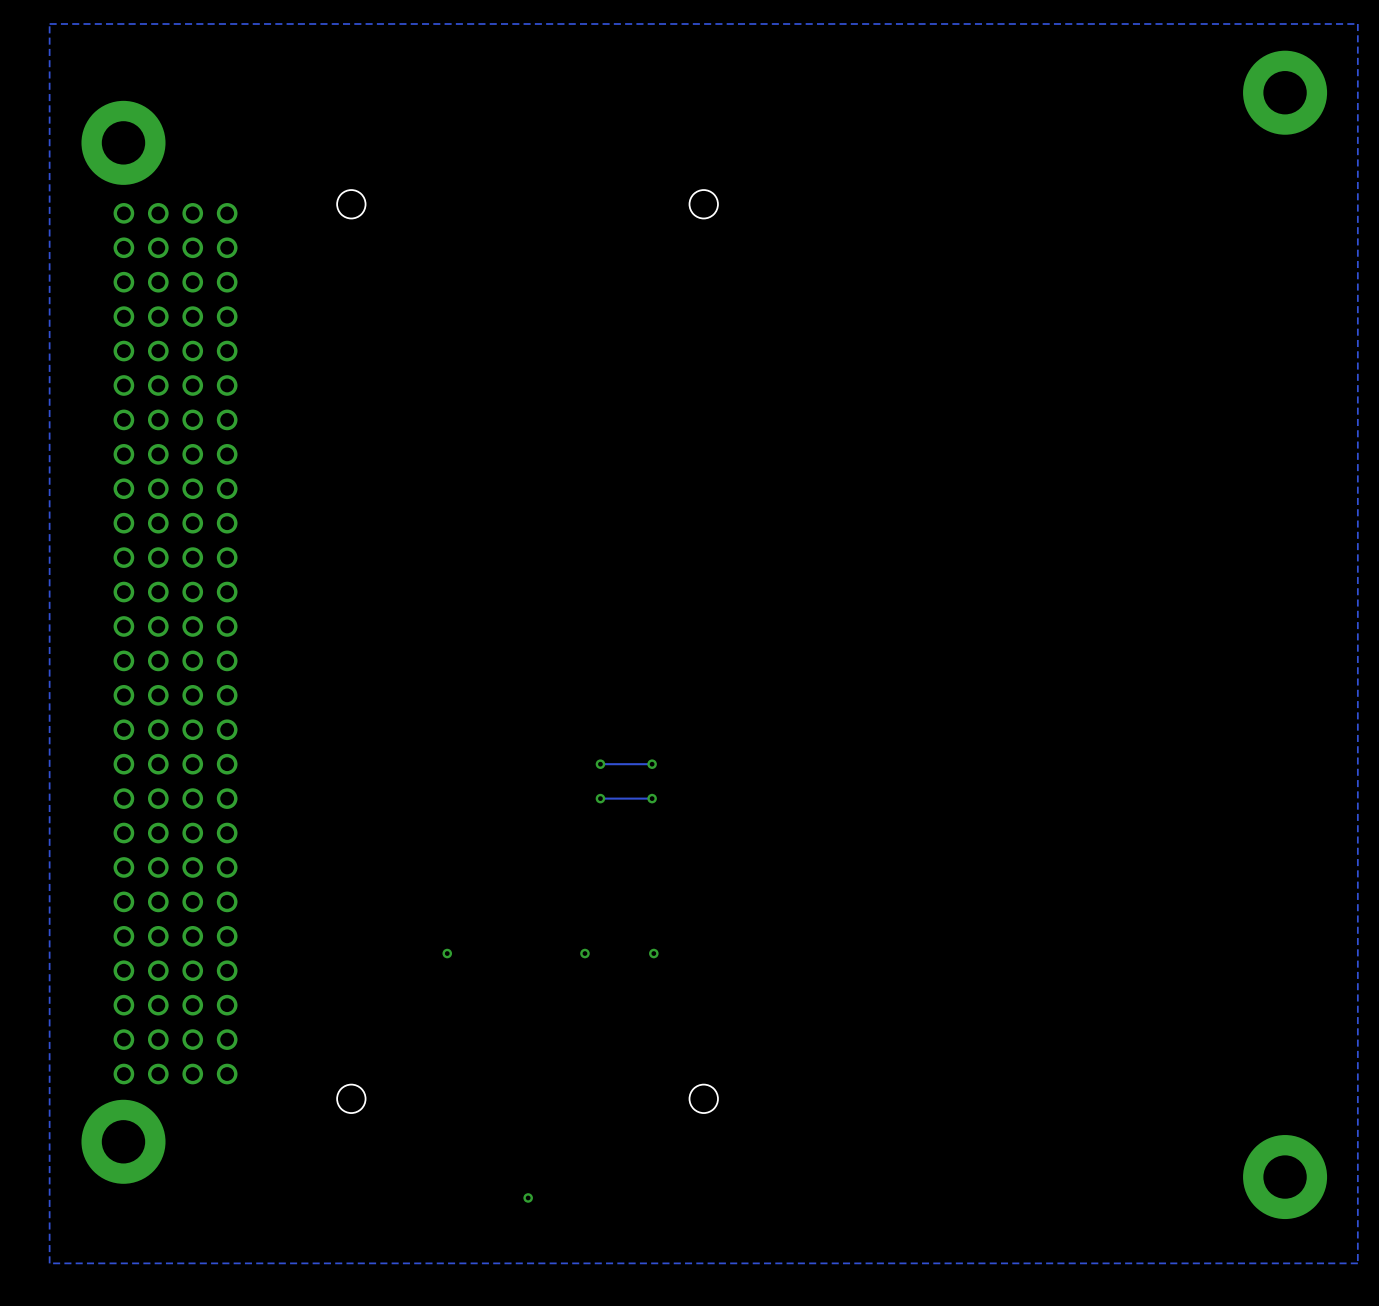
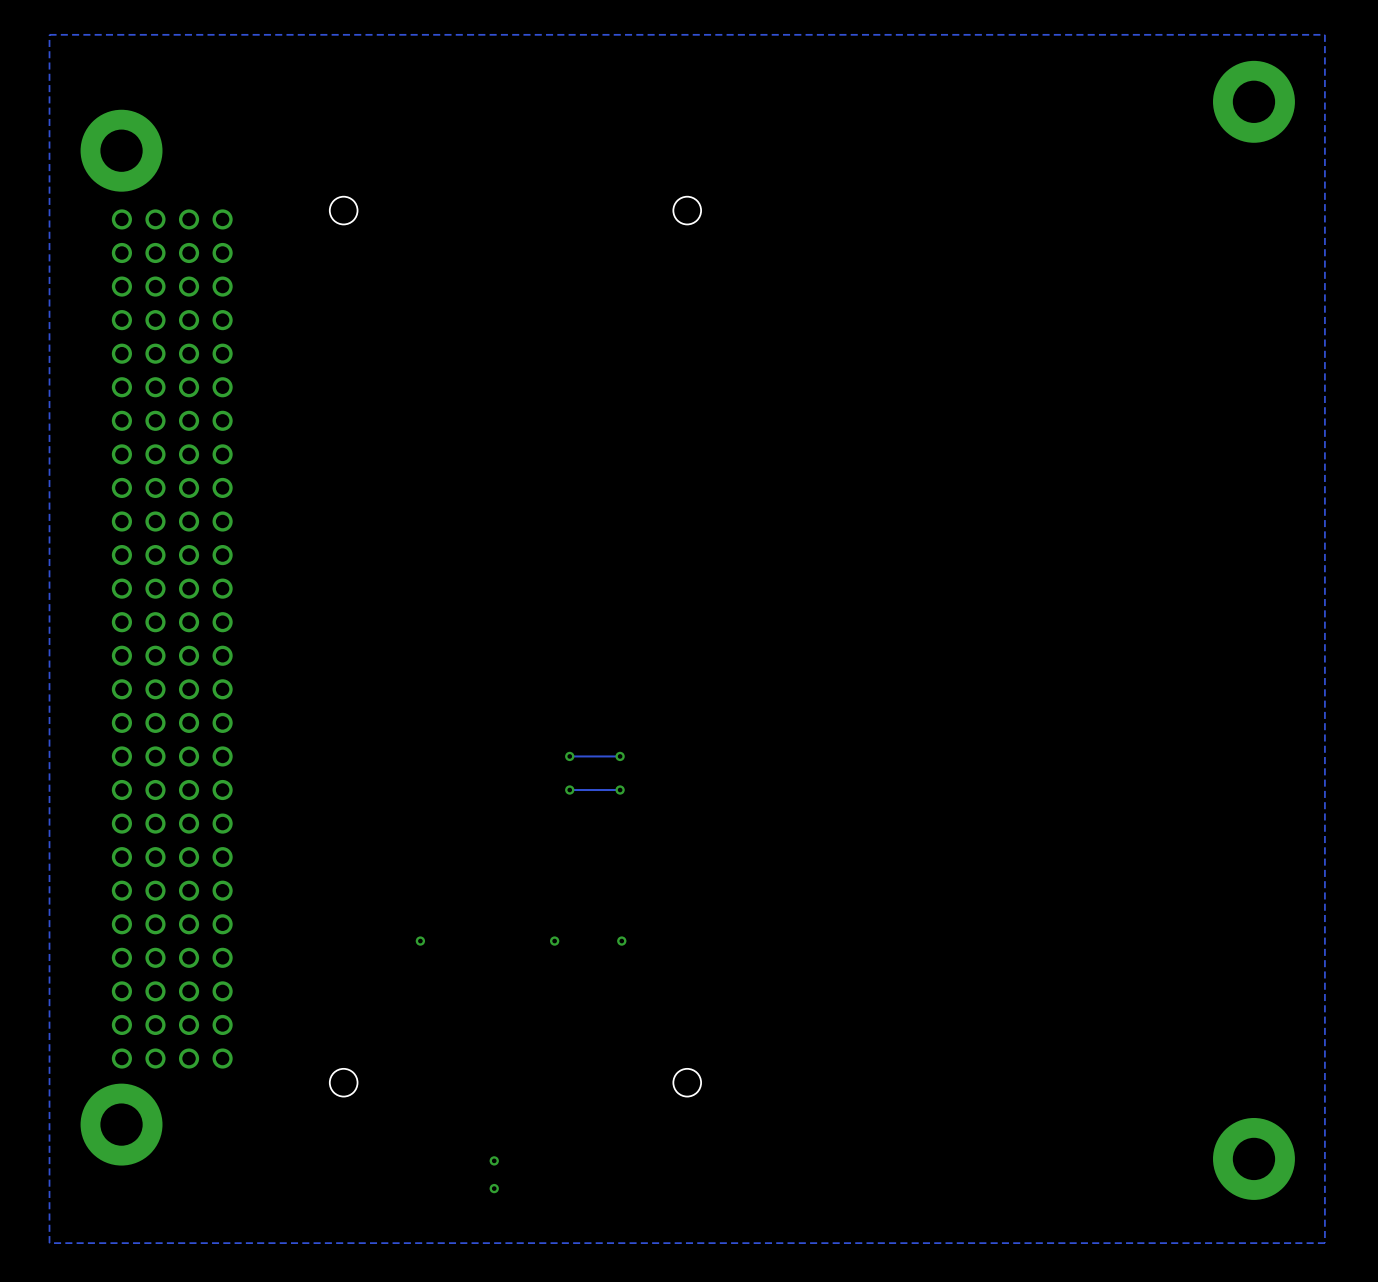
via: none -> (569, 756)
via: (600, 764) -> none
via: none -> (620, 756)
track: (652, 764) (634, 764) -> (586, 756) (569, 756)
via: (652, 764) -> none
via: none -> (569, 790)
via: (600, 798) -> none
via: none -> (620, 790)
track: (652, 798) (634, 798) -> (586, 790) (569, 790)
via: (652, 798) -> none
via position: (447, 953) -> (420, 941)
via position: (584, 953) -> (554, 941)
via position: (653, 953) -> (621, 941)
via: none -> (494, 1160)
via: (528, 1197) -> none
via: none -> (494, 1188)

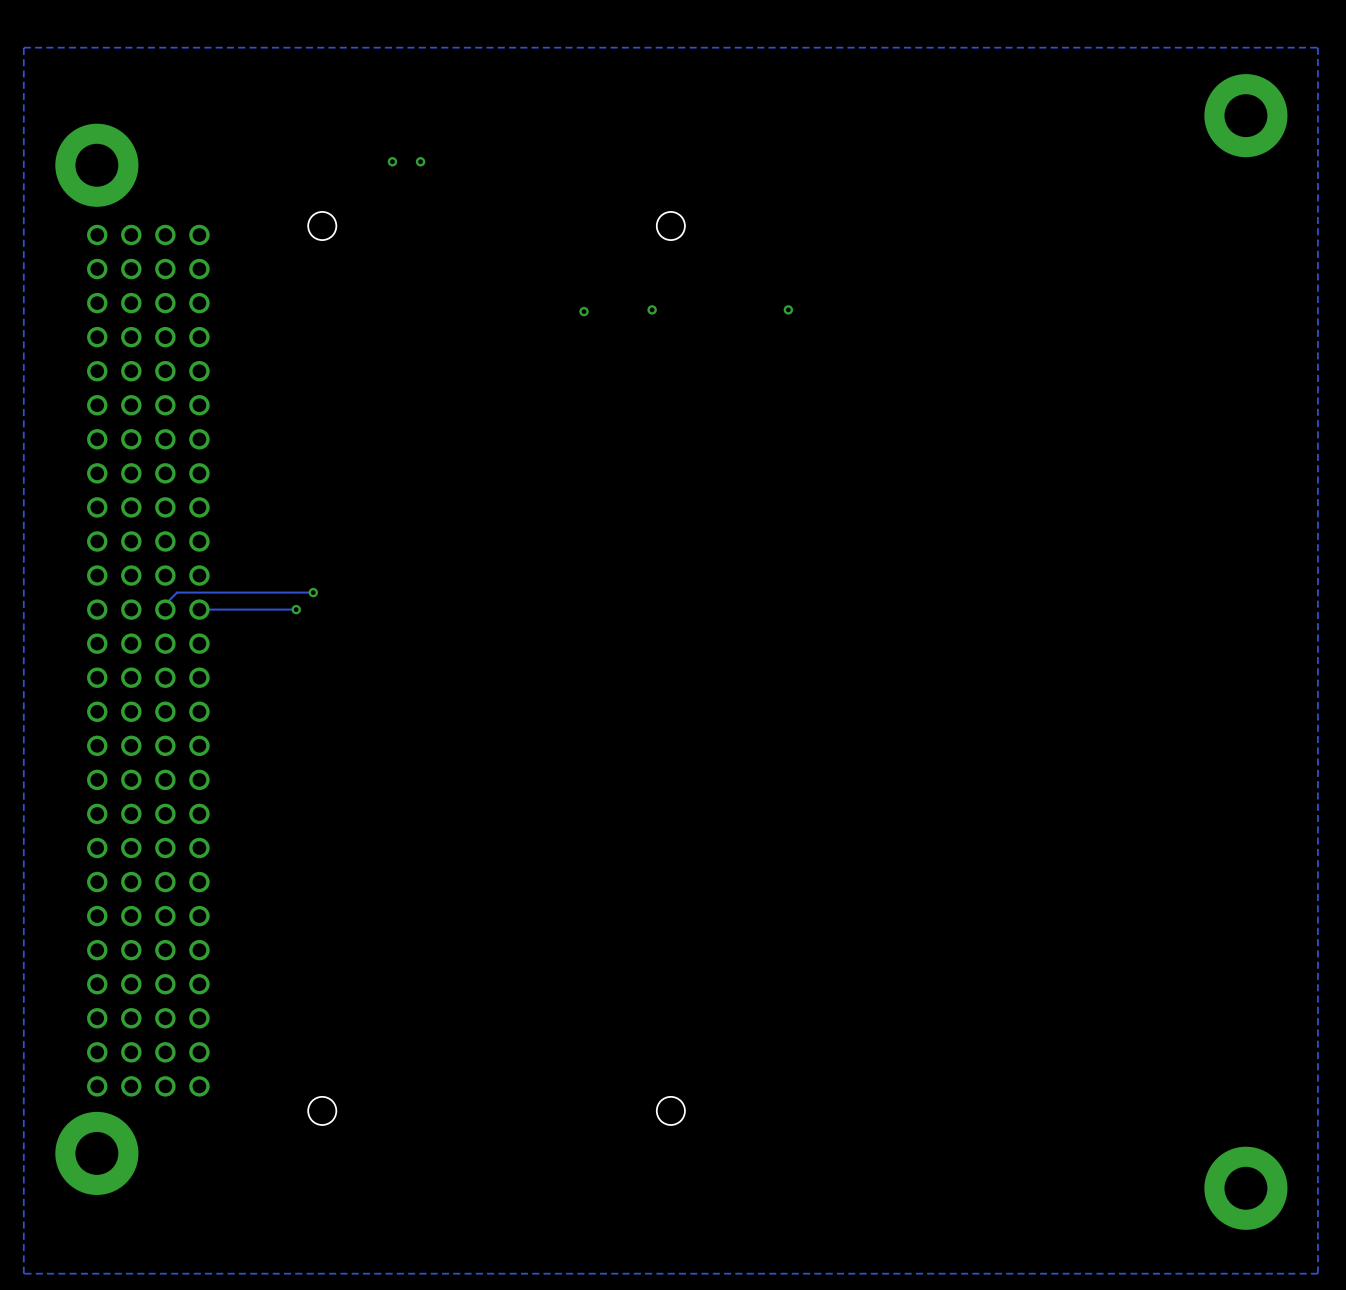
via: none -> (392, 161)
via: none -> (420, 161)
via: none -> (652, 309)
via: none -> (788, 309)
via: none -> (584, 311)
track: none -> (313, 592) (177, 592) (165, 604) (165, 609)
via: none -> (313, 592)
track: none -> (296, 609) (199, 609)
via: none -> (296, 609)
via: (569, 756) -> none
track: (620, 756) (569, 756) -> none
via: (620, 756) -> none
via: (569, 790) -> none
track: (620, 790) (569, 790) -> none
via: (620, 790) -> none
via: (420, 941) -> none
via: (554, 941) -> none
via: (621, 941) -> none
via: (494, 1160) -> none
via: (494, 1188) -> none

